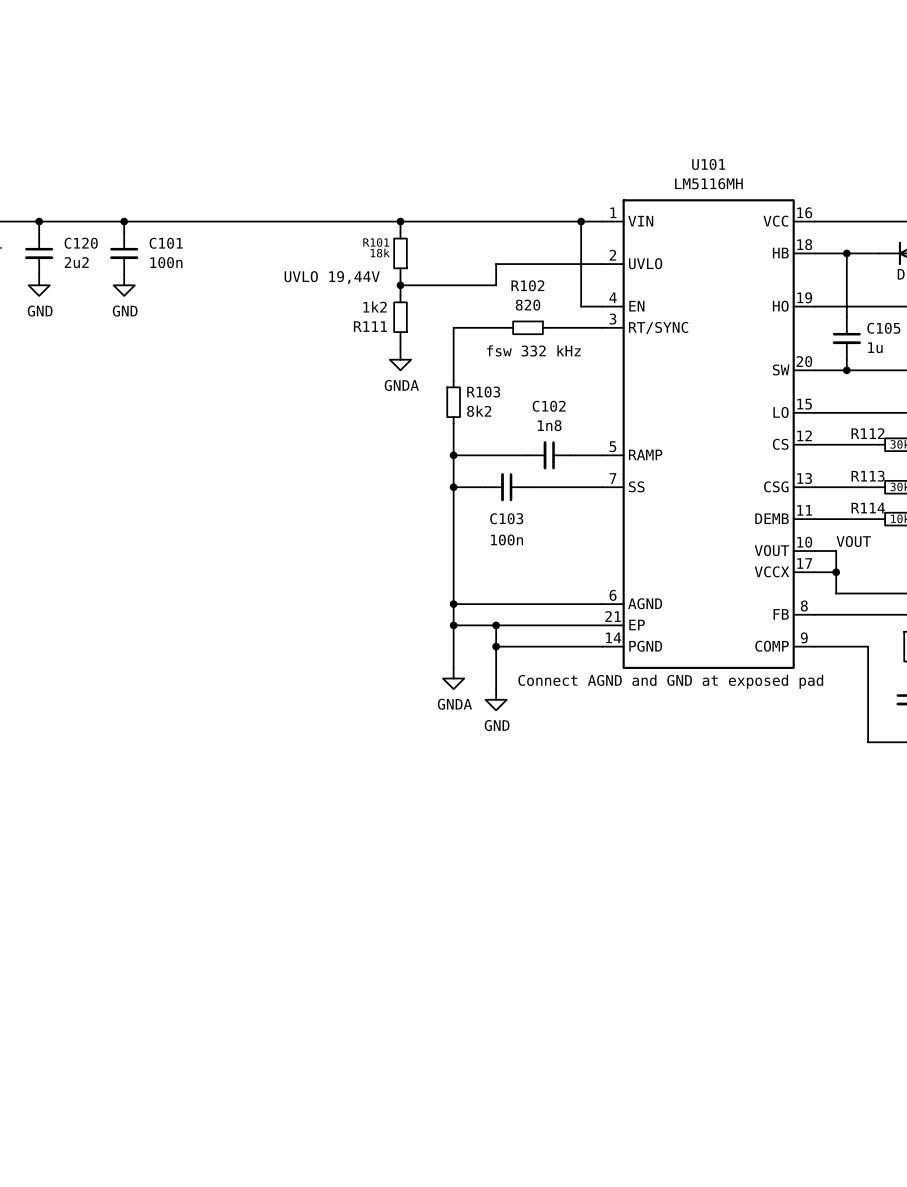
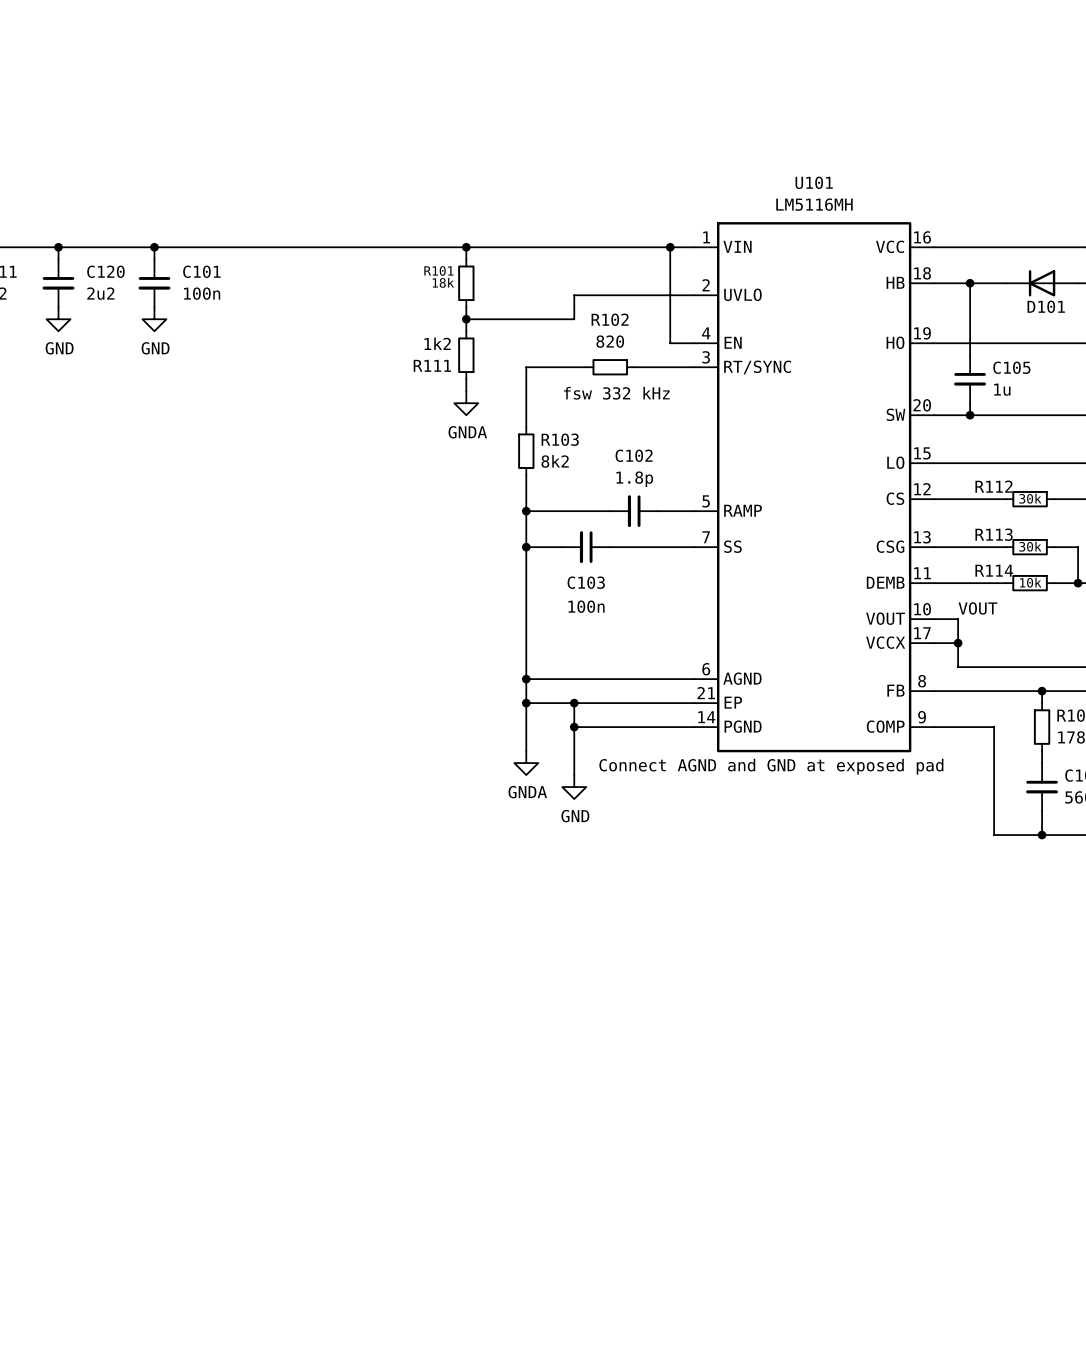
text: UVLO 19,44V (332, 277) -> none
C102 value: 1n8 (549, 425) -> 1.8p (634, 479)

